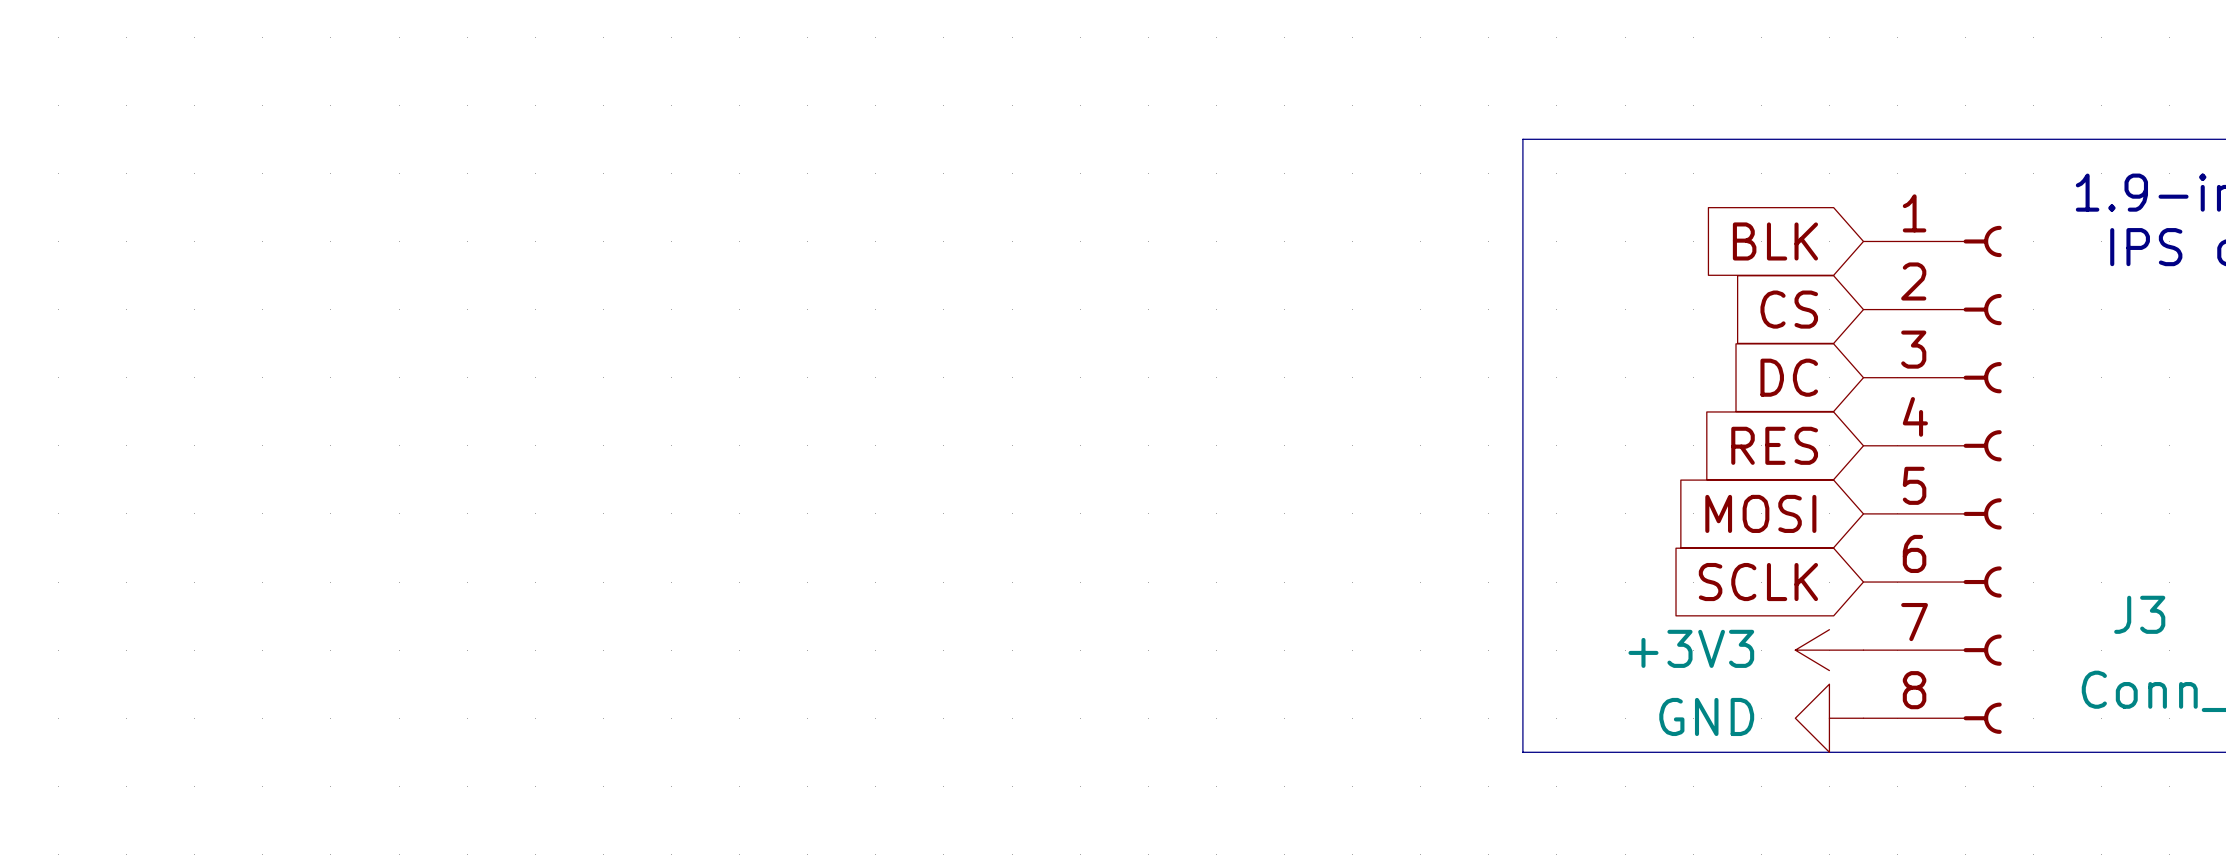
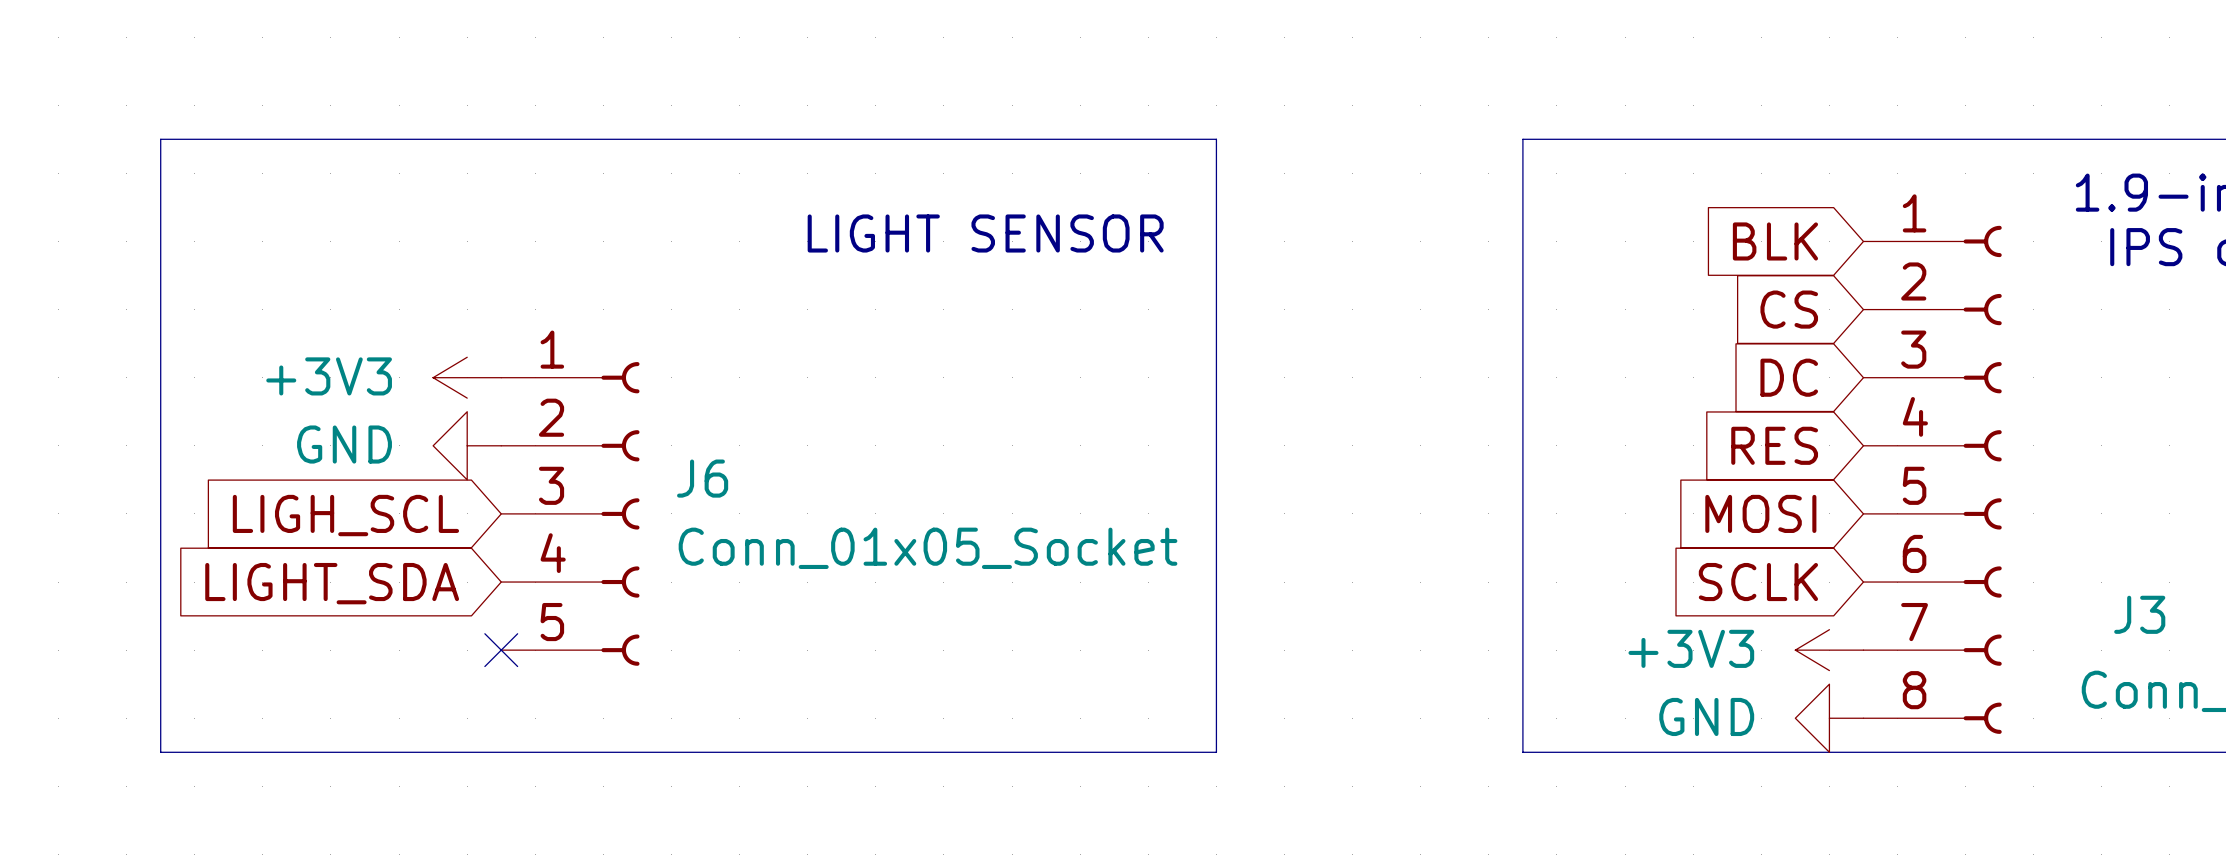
line: none -> (160, 139) (1216, 139) (1216, 752) (160, 752) (160, 139)
text: none -> LIGHT SENSOR (985, 233)
power symbol: none -> +3V3 (467, 377)
power symbol: none -> GND (467, 445)
J6: none -> Conn_01x05_Socket (570, 513)
global label: none -> LIGH_SCL (345, 515)
global label: none -> LIGHT_SDA (332, 583)
no-connect mark: none -> (501, 650)

